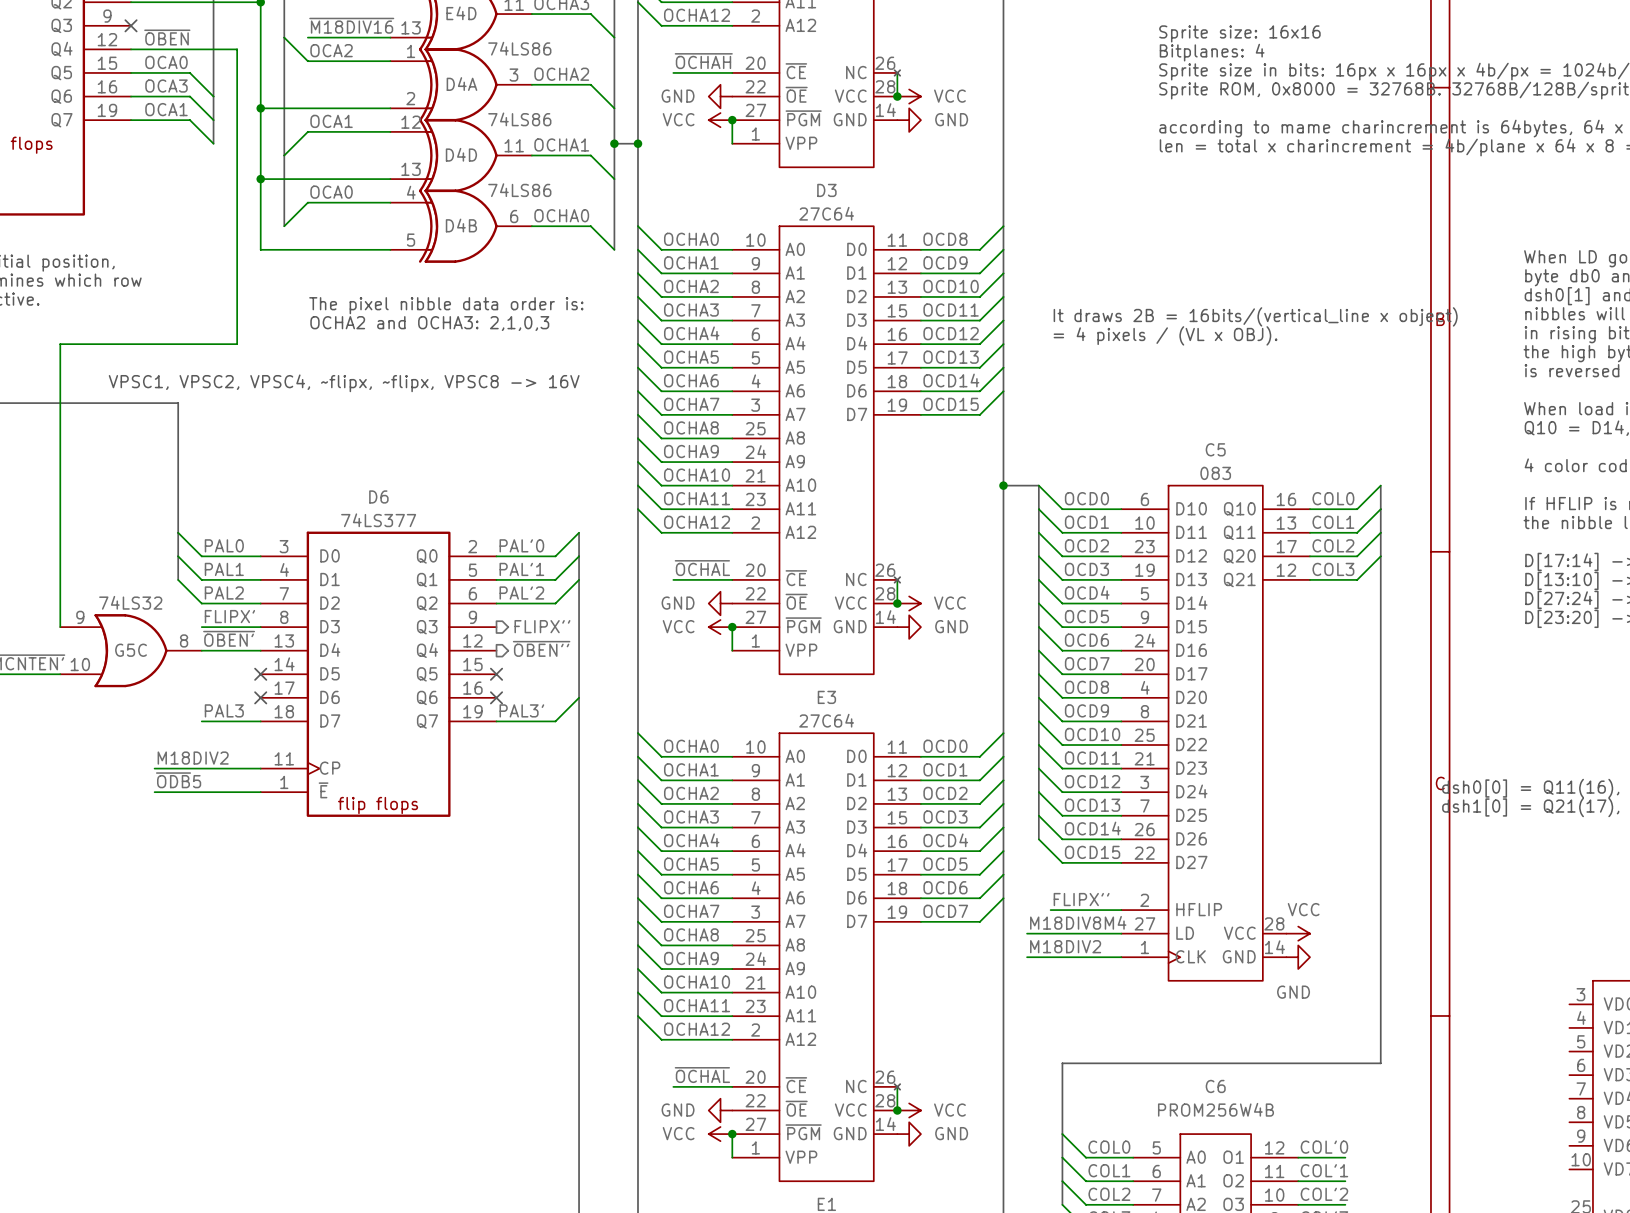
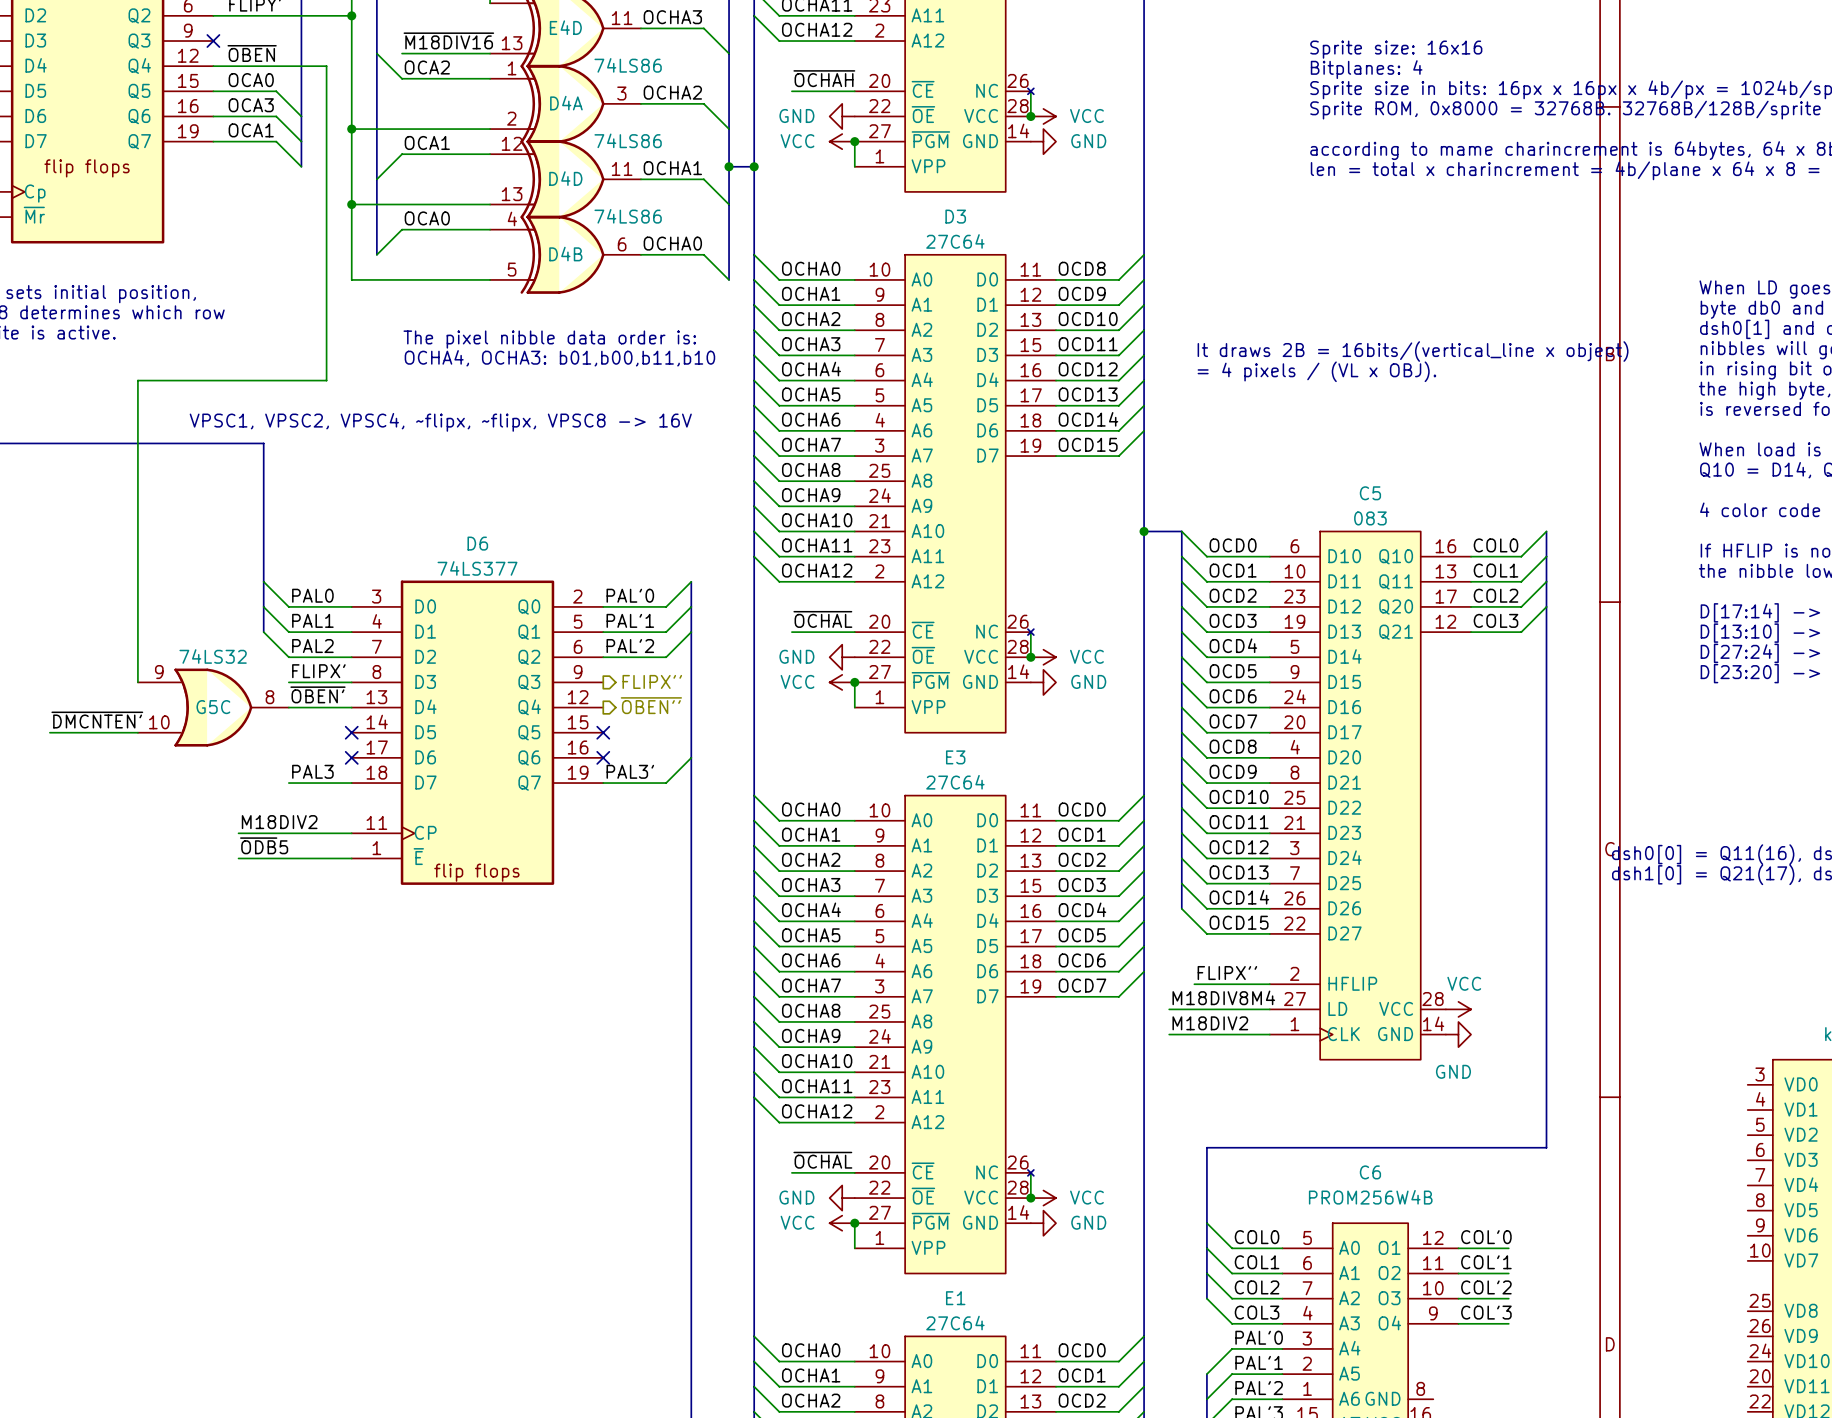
text: OCHA2 and OCHA3: 2,1,0,3 (429, 323) -> OCHA4, OCHA3: b01,b00,b11,b10 (559, 358)

